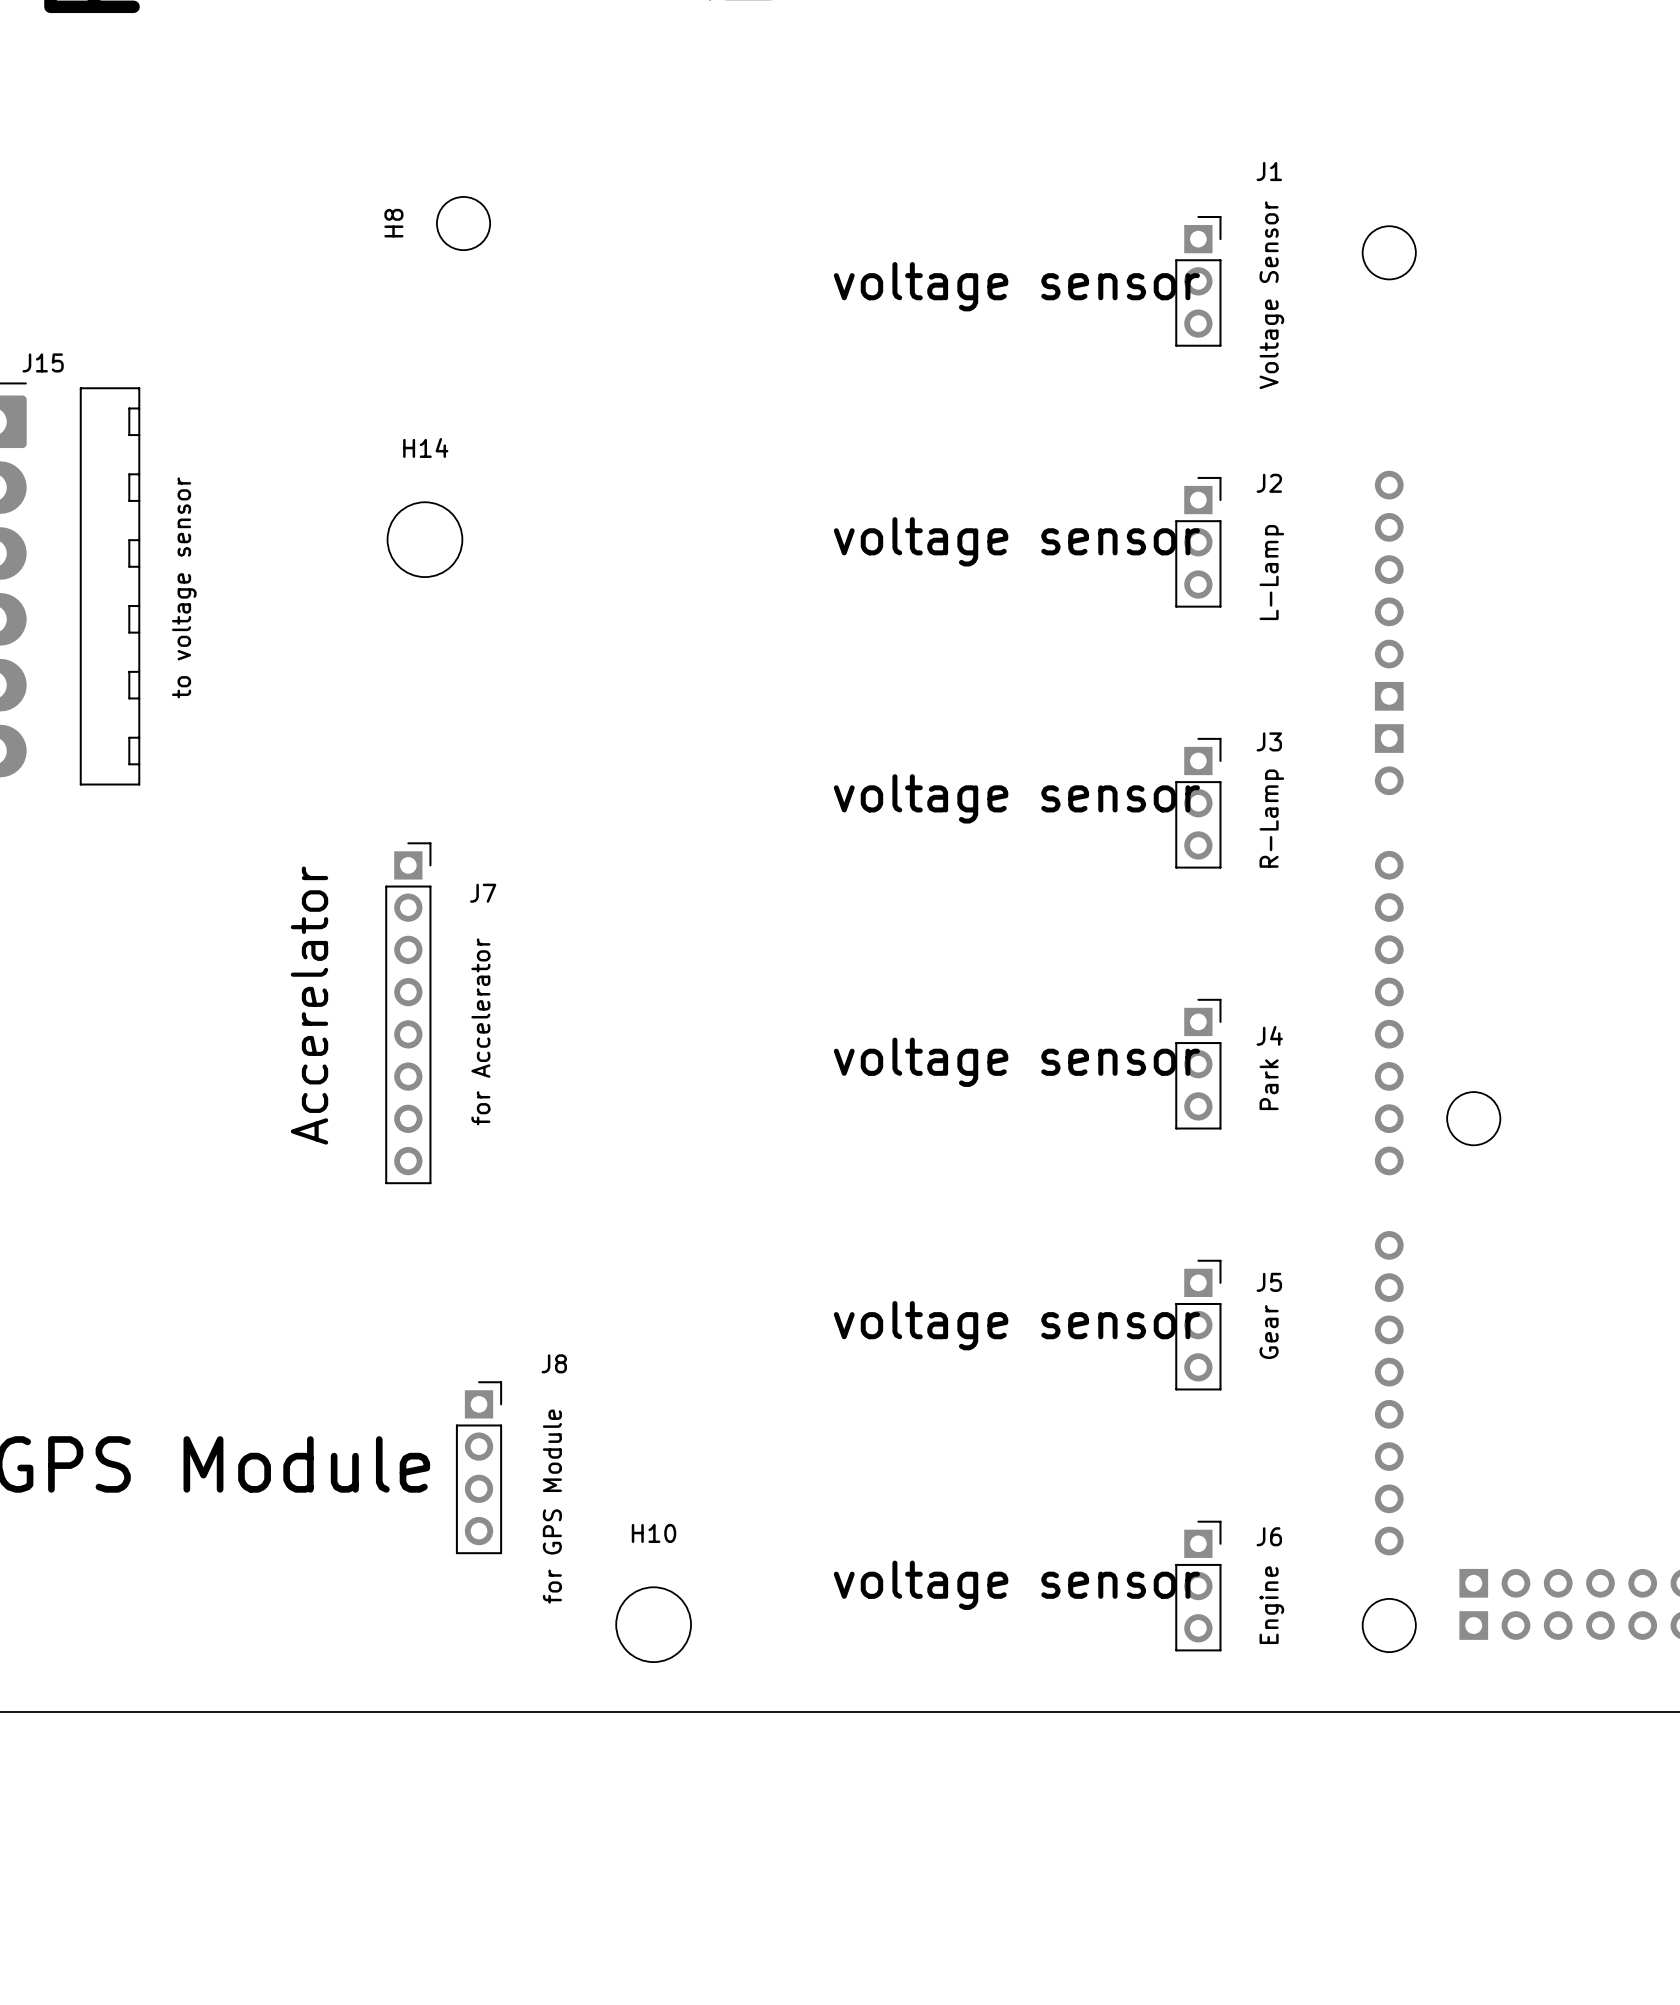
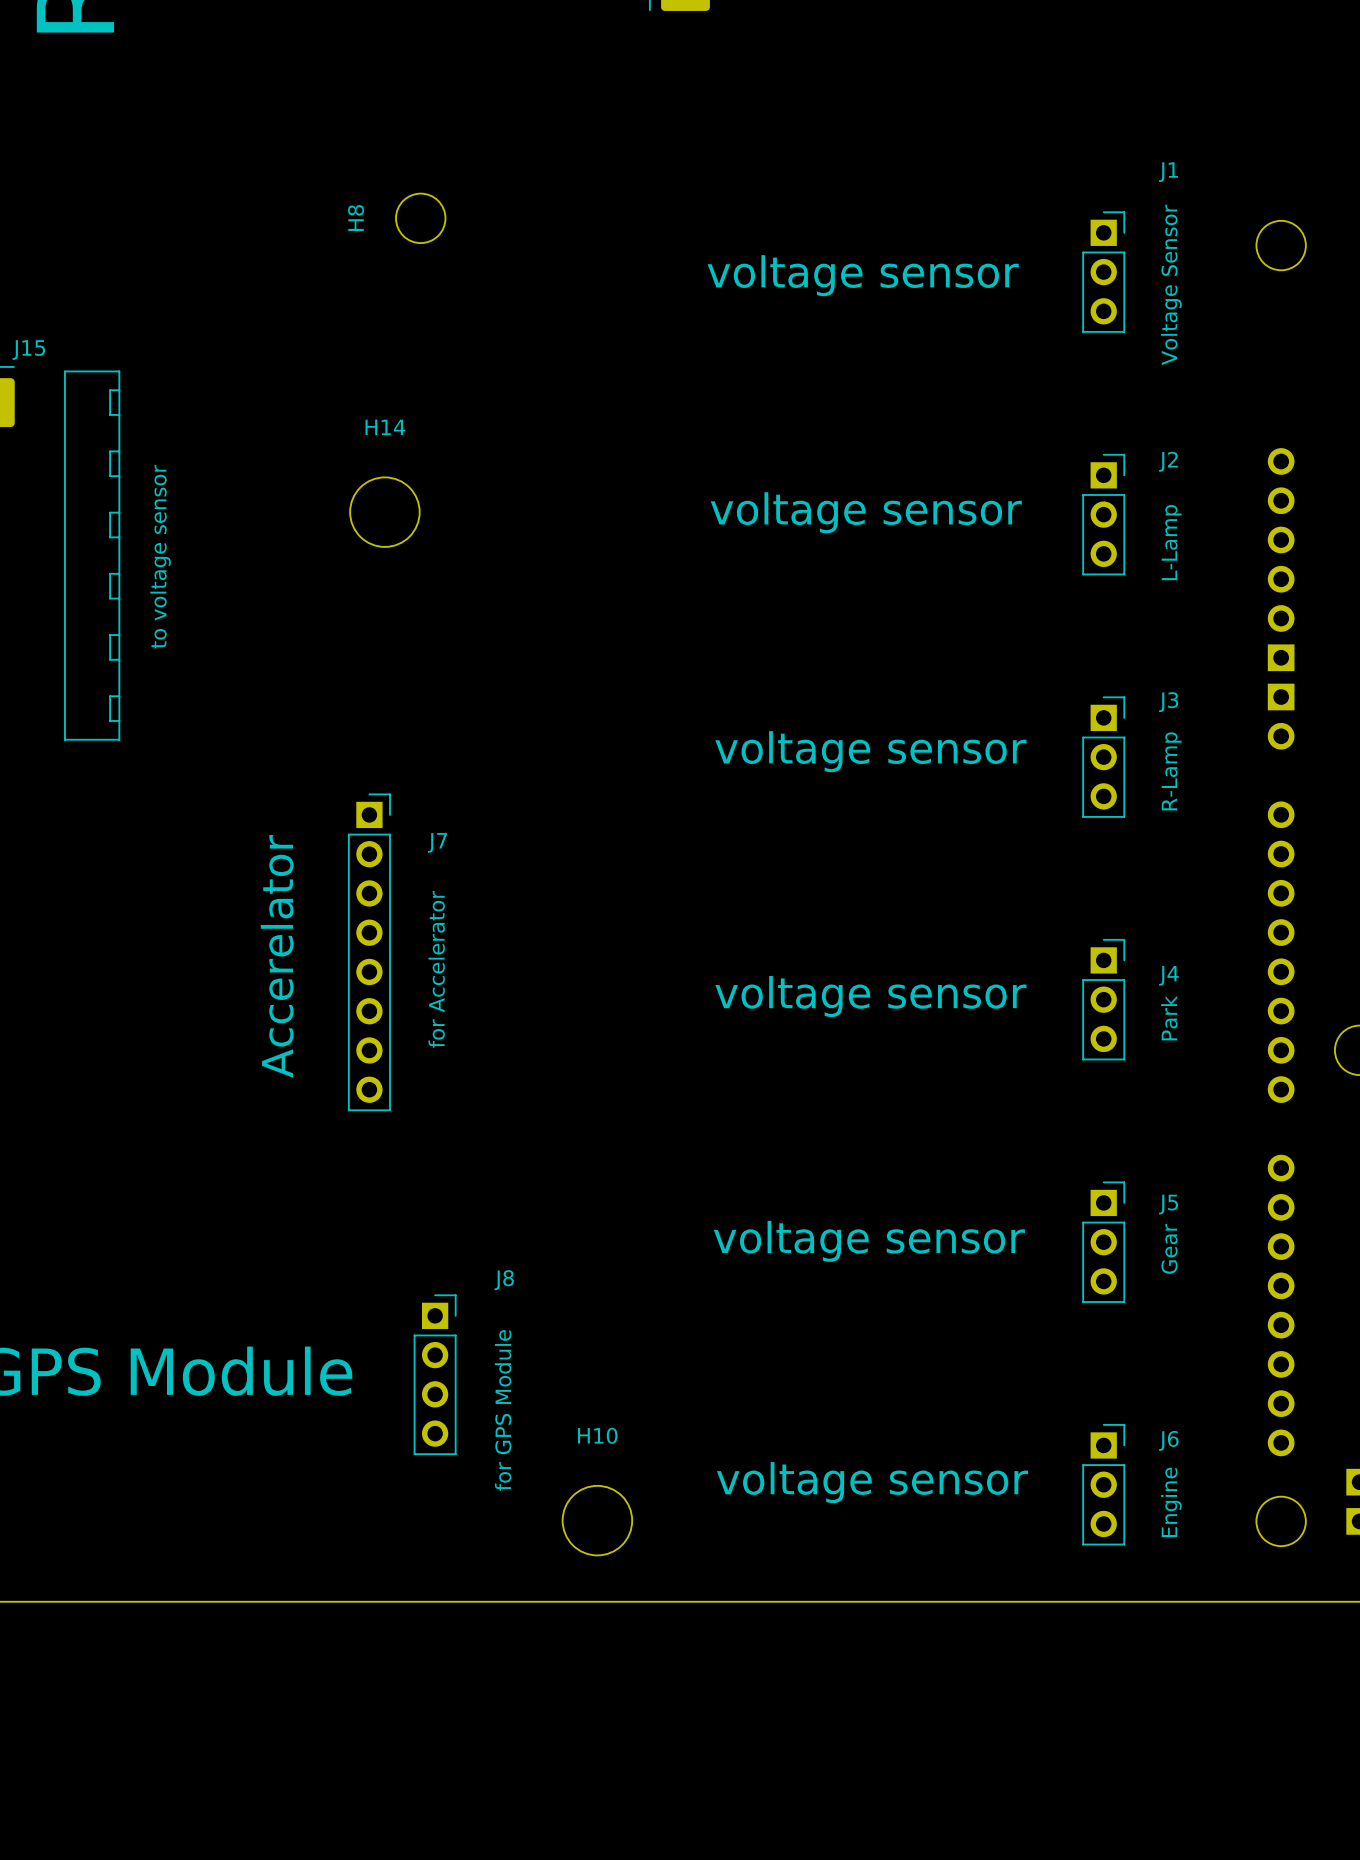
text position: voltage sensor (1016, 286) -> voltage sensor (863, 275)
text position: voltage sensor (1016, 541) -> voltage sensor (866, 512)
text position: voltage sensor (1016, 798) -> voltage sensor (870, 751)
text position: voltage sensor (1016, 1062) -> voltage sensor (870, 996)
text position: voltage sensor (1016, 1325) -> voltage sensor (869, 1241)
text position: voltage sensor (1016, 1585) -> voltage sensor (872, 1482)

